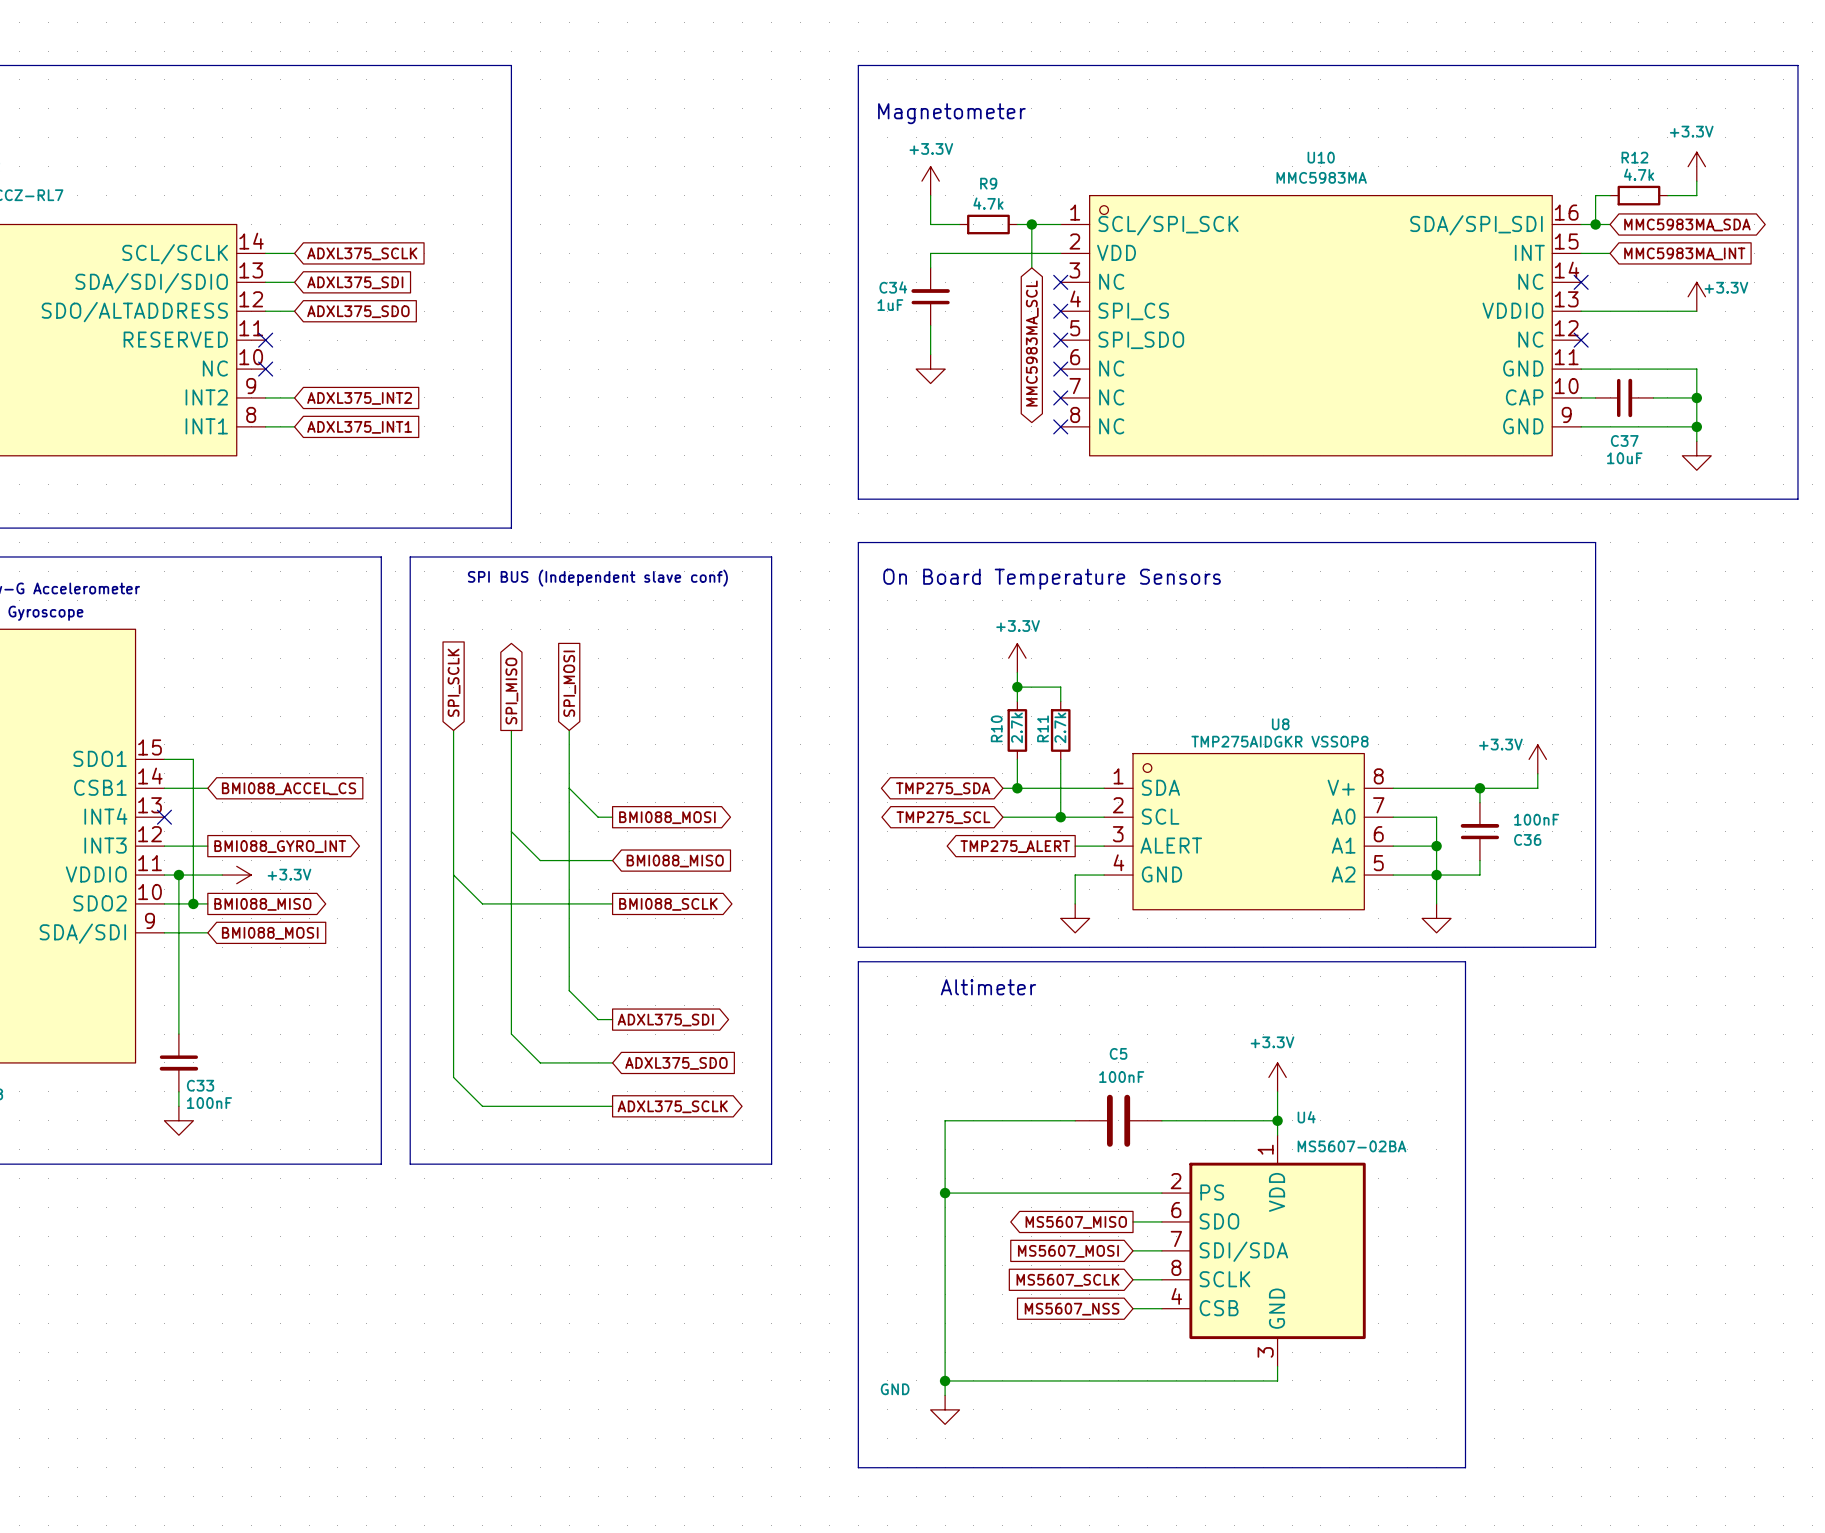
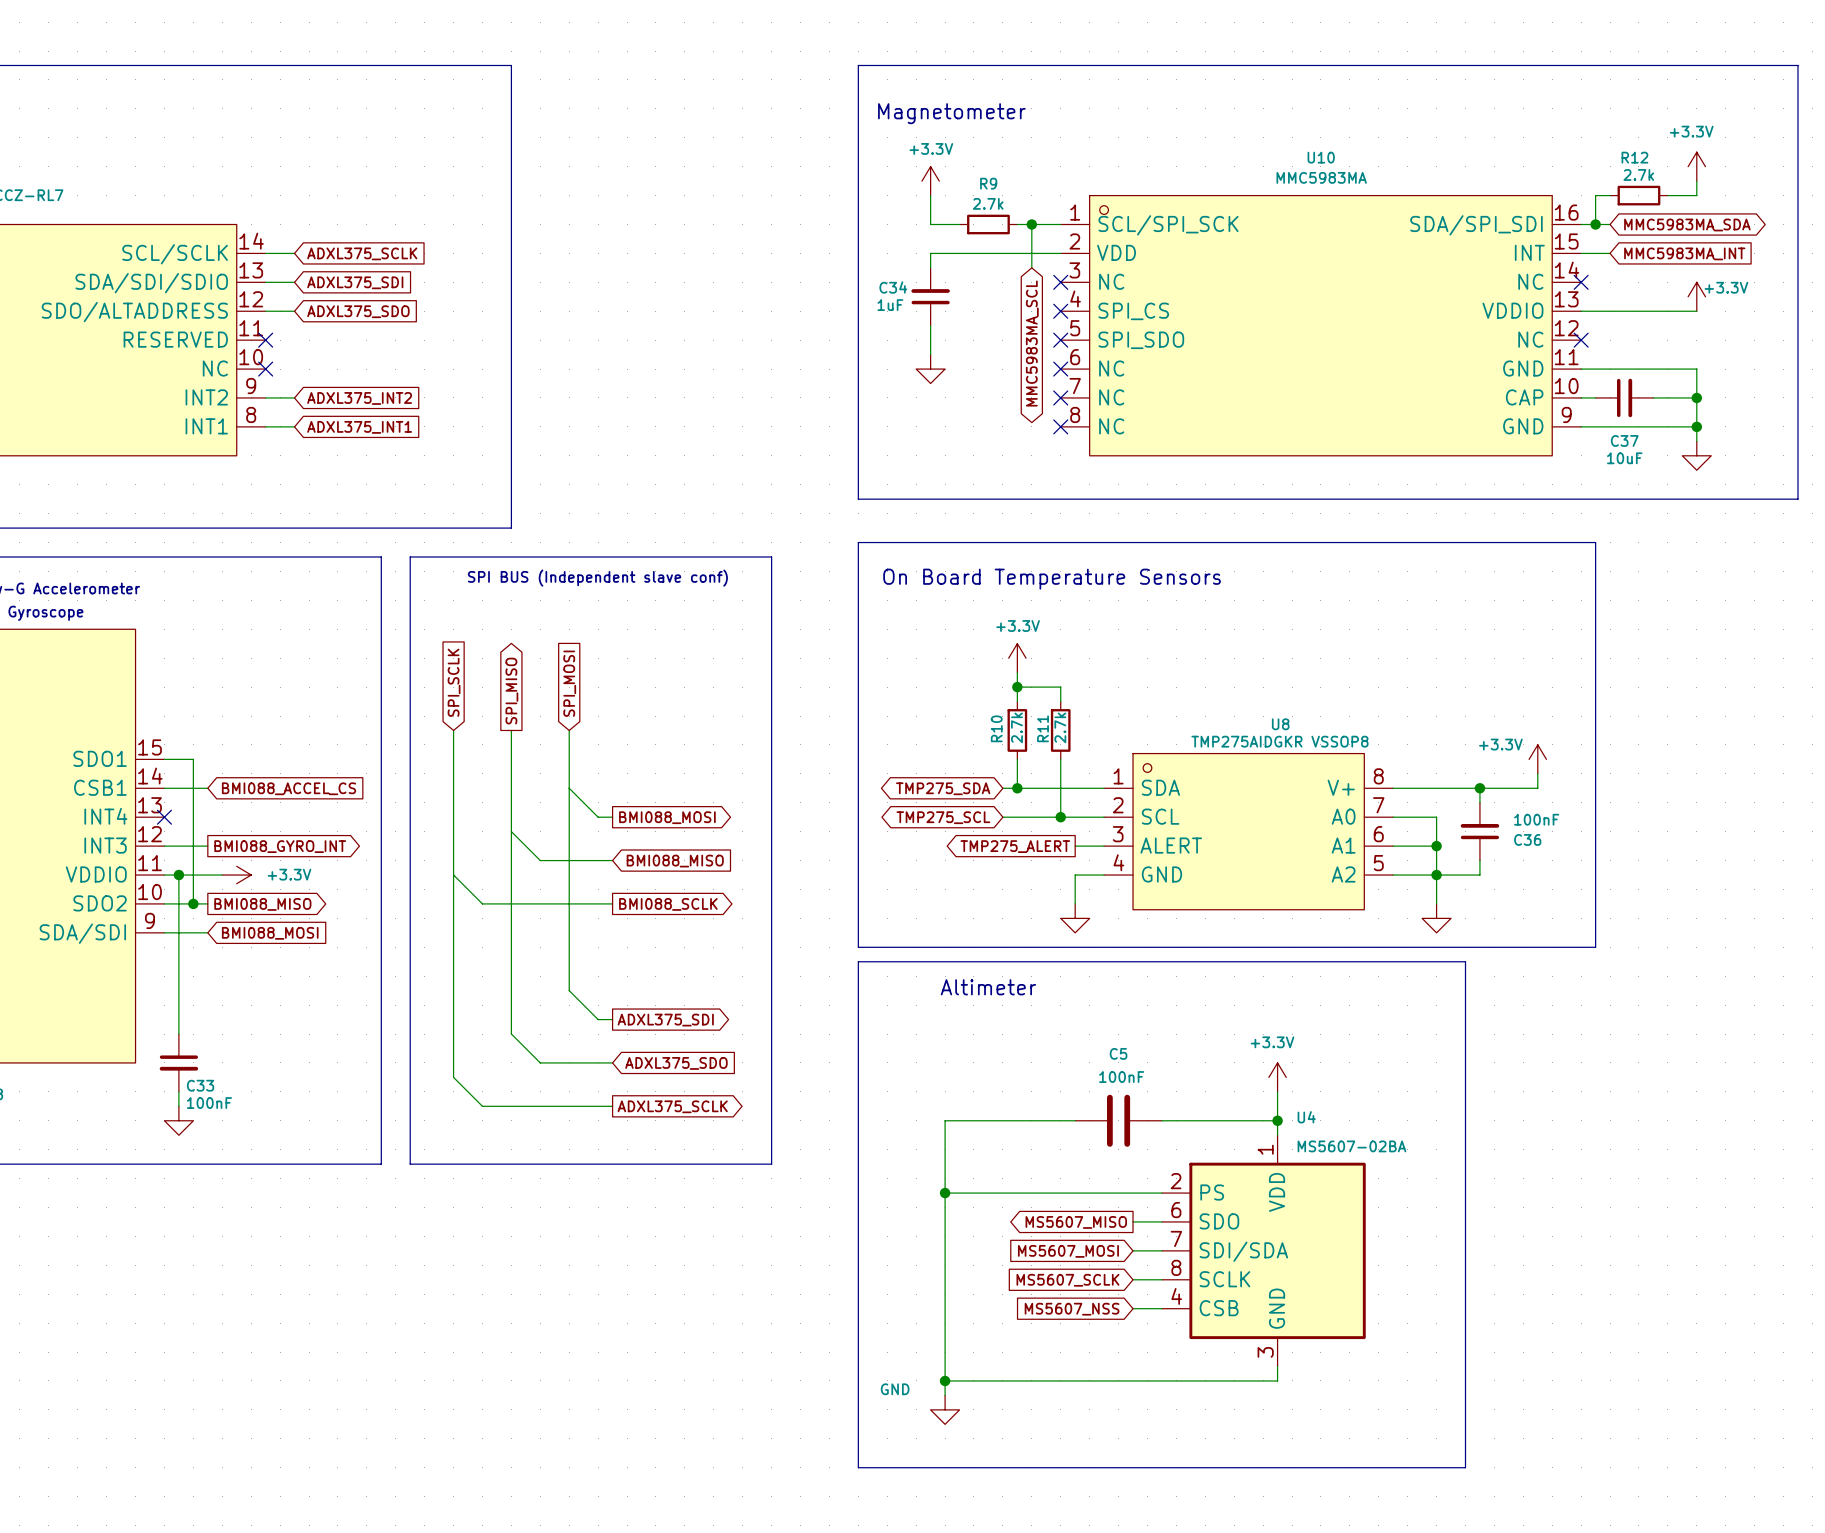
R12 value: 4.7k (1639, 174) -> 2.7k (1638, 174)
R9 value: 4.7k (988, 203) -> 2.7k (988, 203)

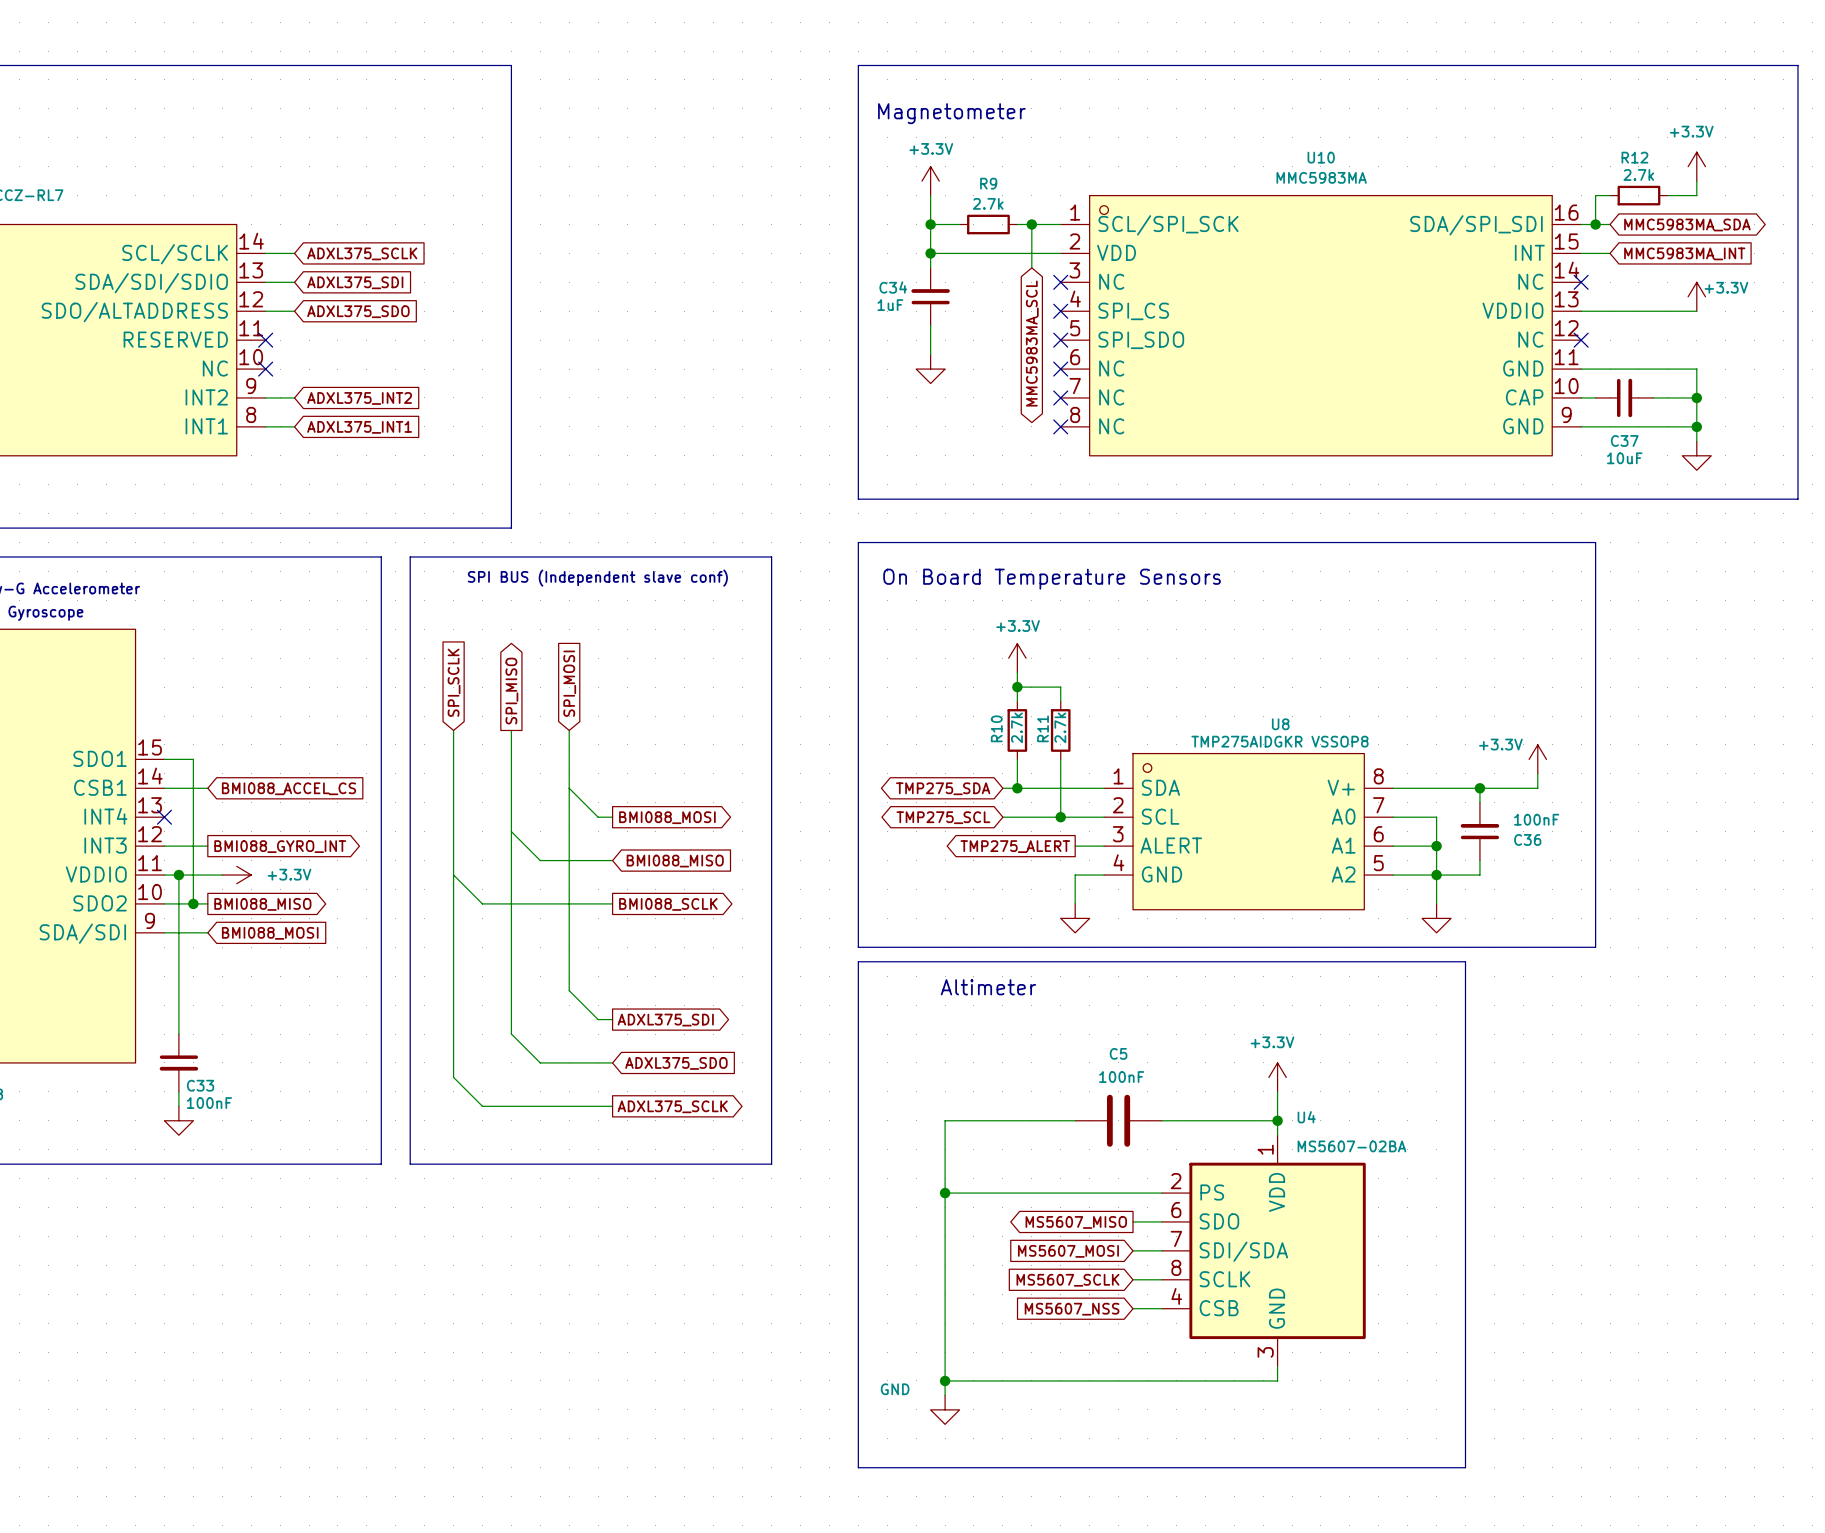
wire: none -> (930, 224) (930, 253)
junction: none -> (930, 224)
junction: none -> (930, 253)

